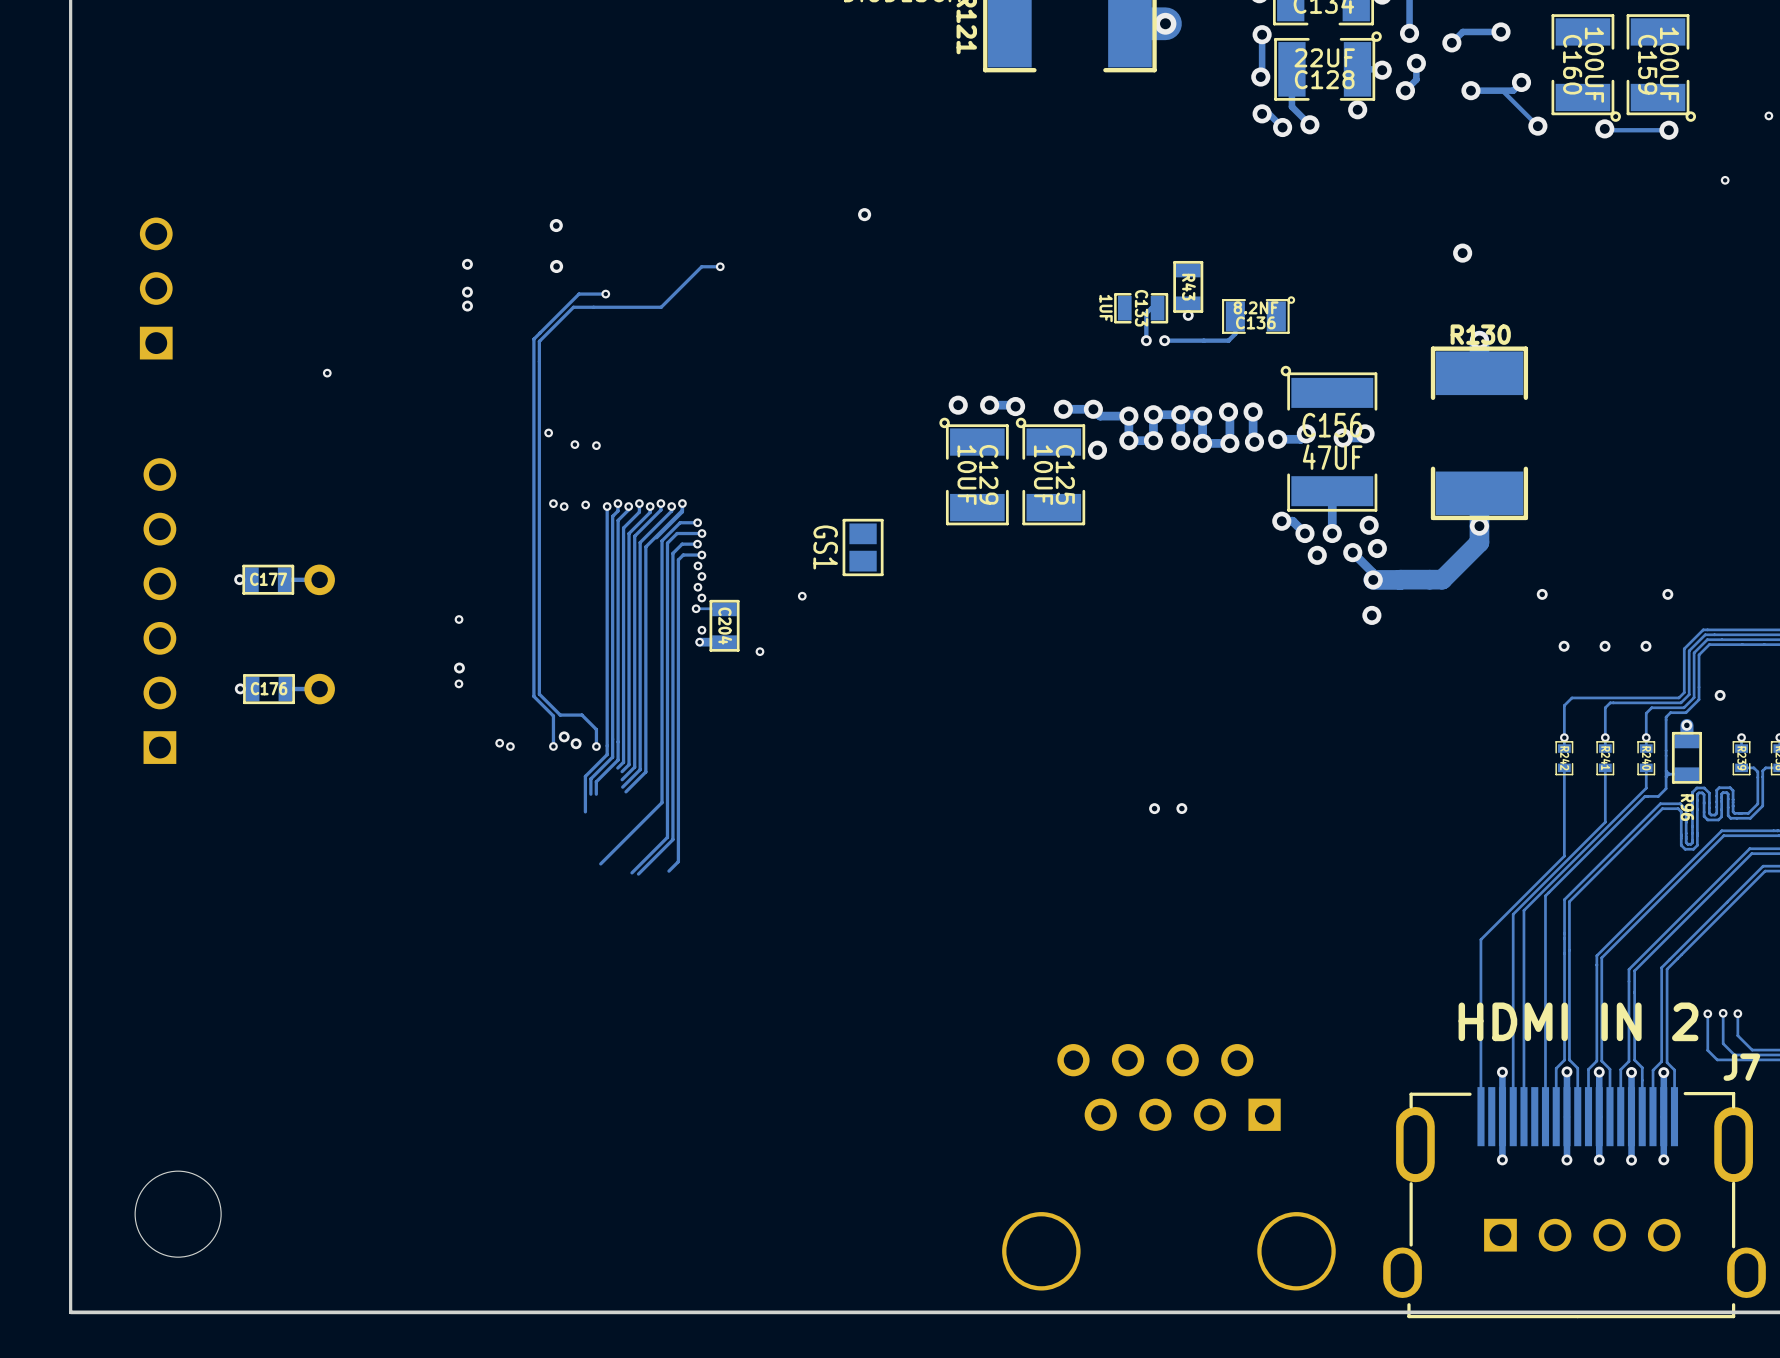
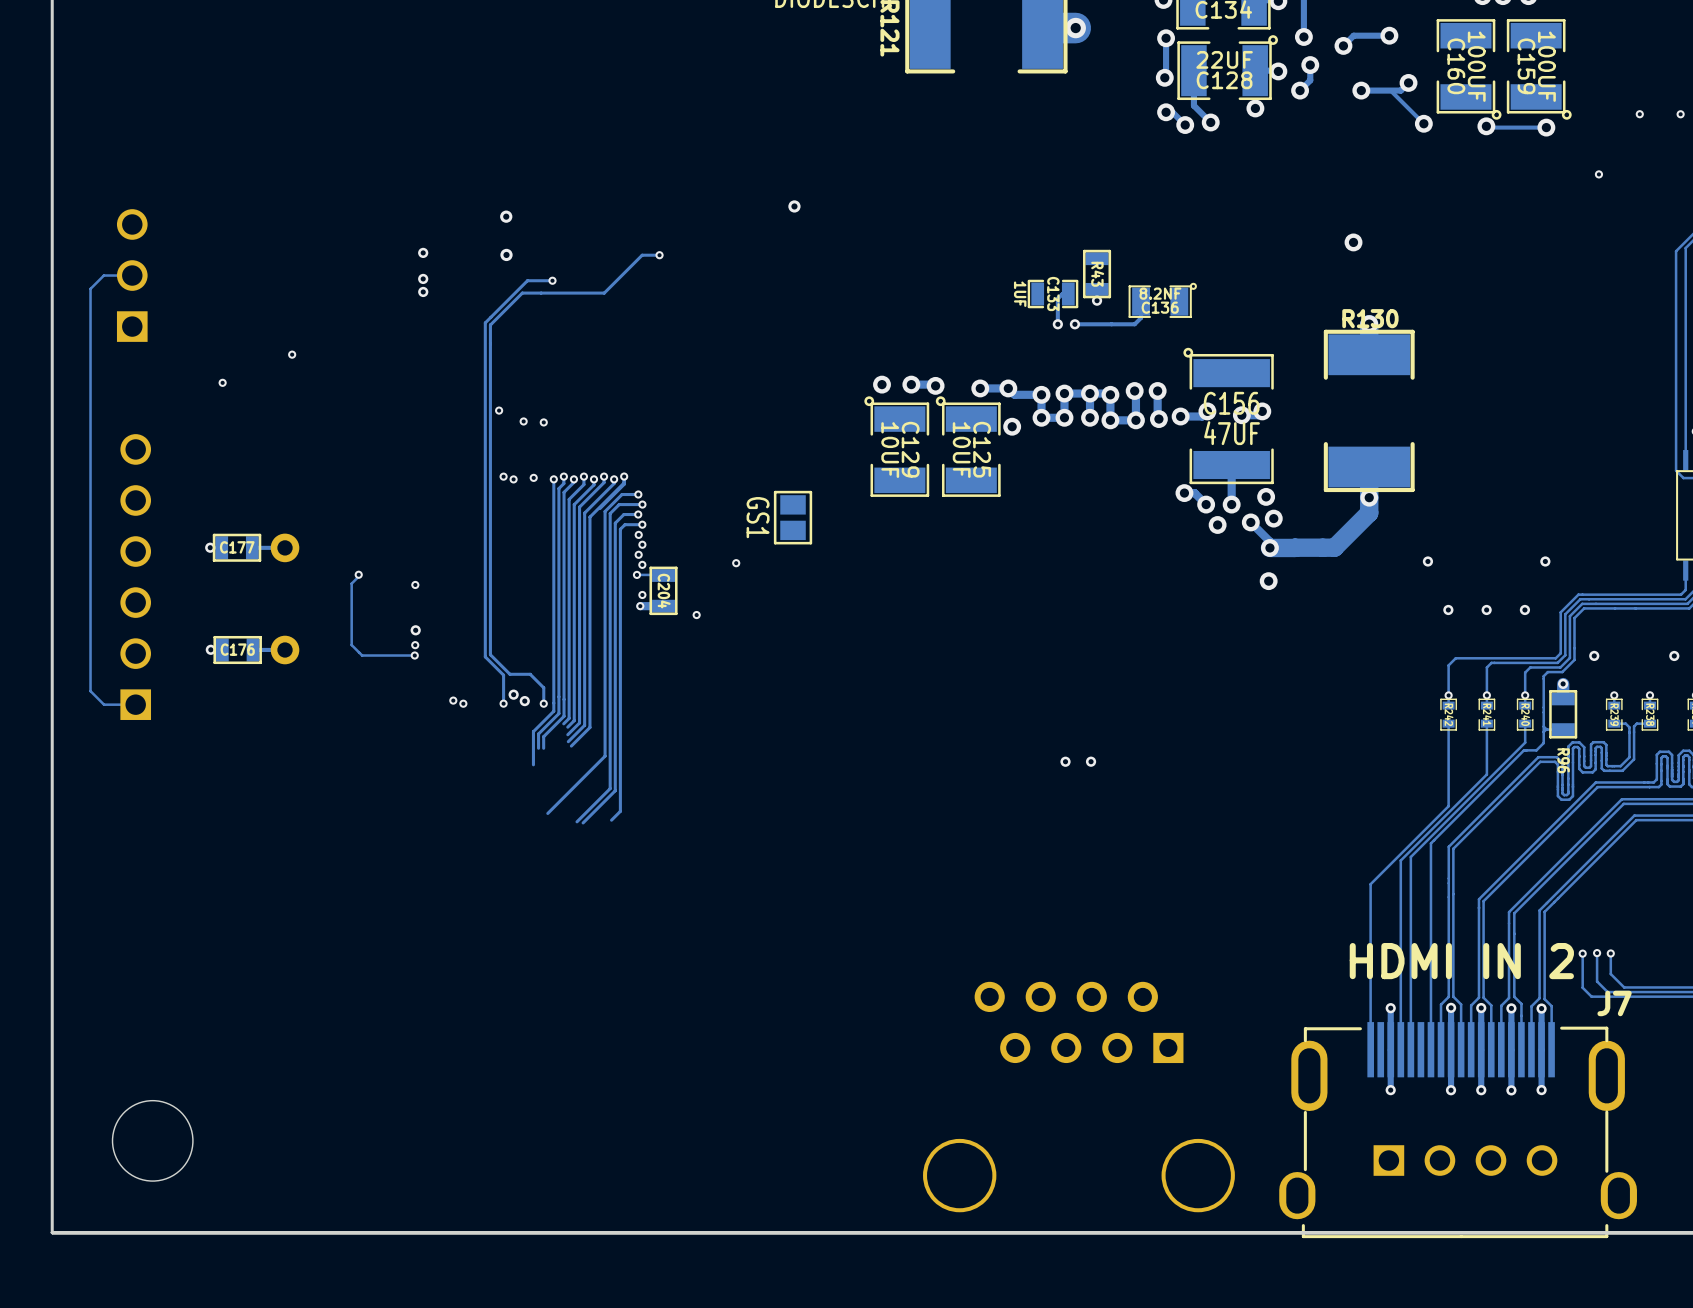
track: none -> (132, 275) (103, 275) (90, 288) (90, 691) (104, 704) (135, 704)
via: none -> (222, 382)
track: none -> (358, 574) (351, 583) (351, 645) (362, 655) (414, 655)
via: none -> (358, 574)
via: none -> (414, 655)

